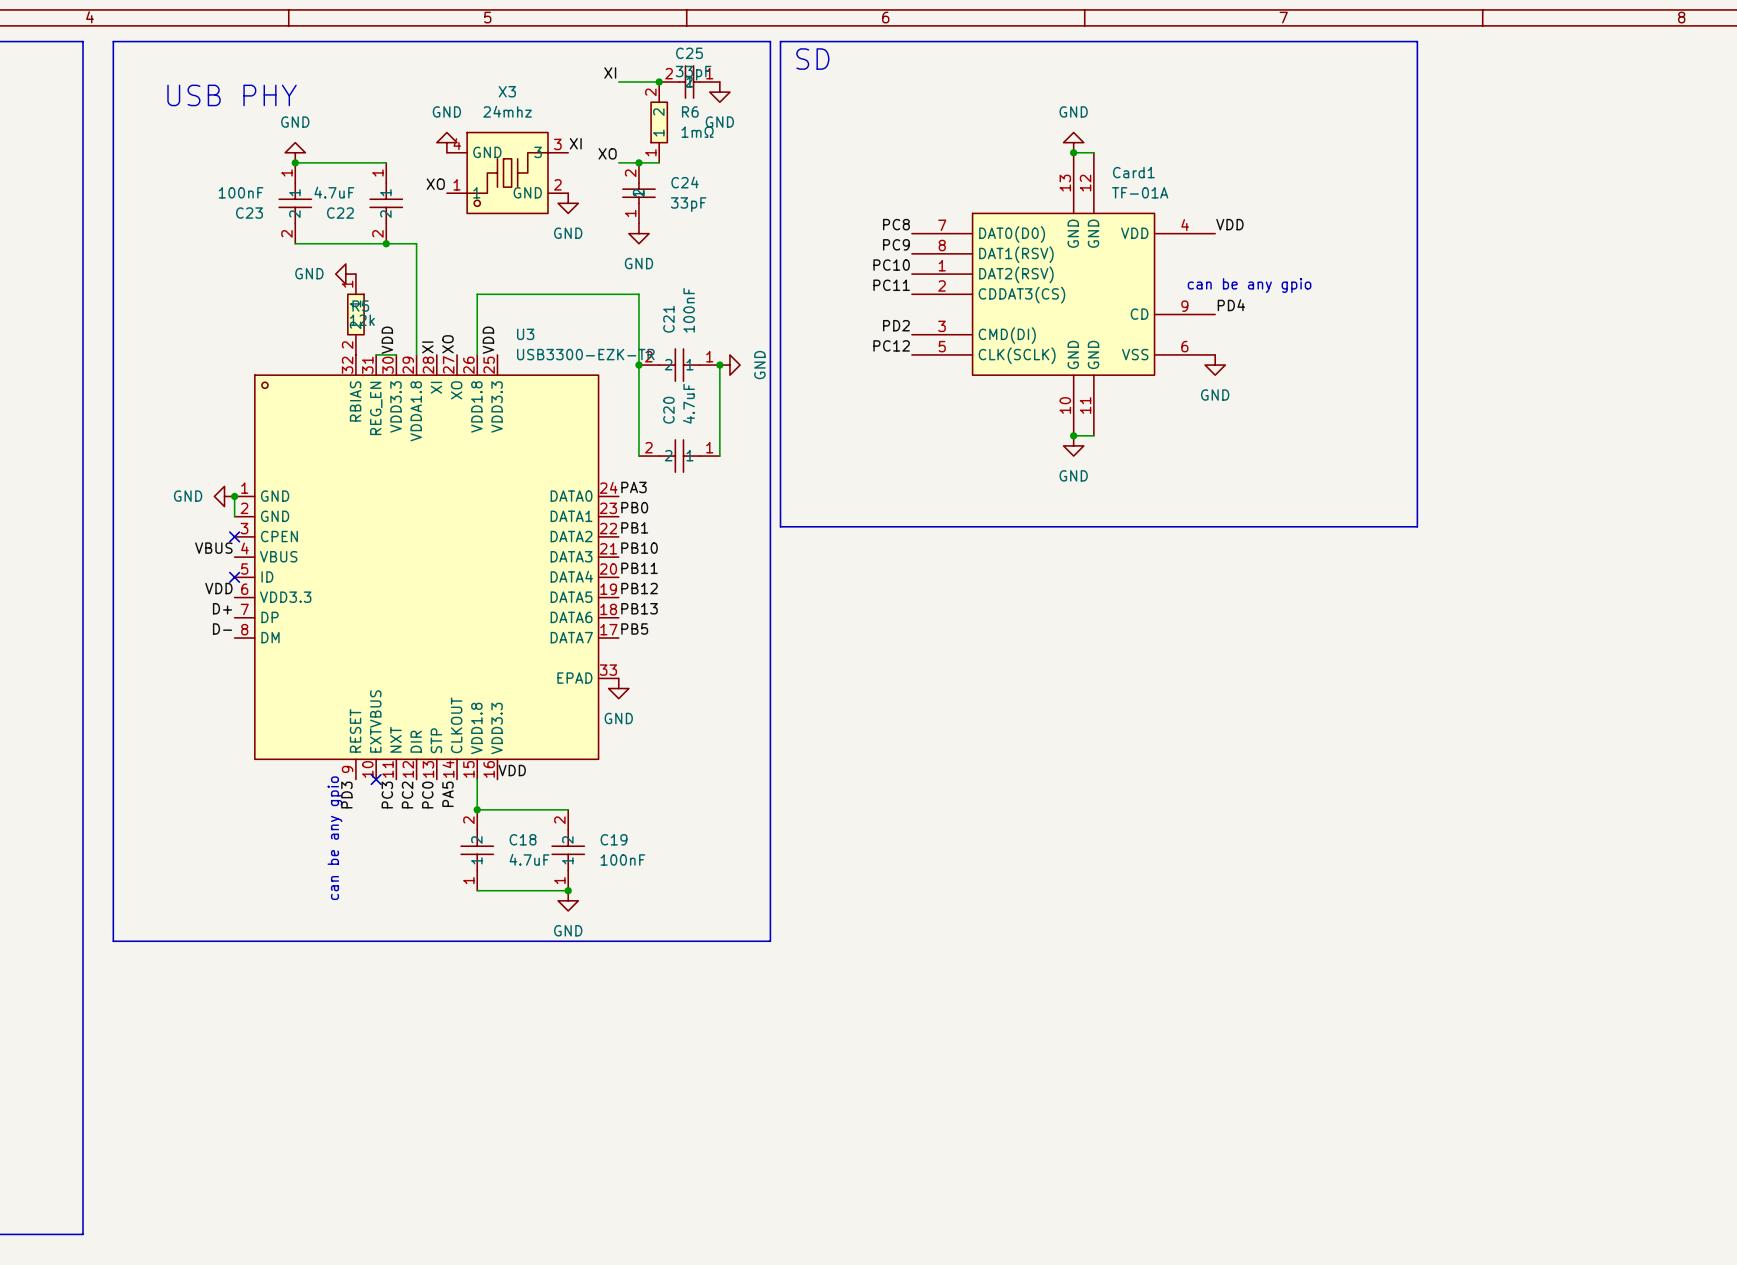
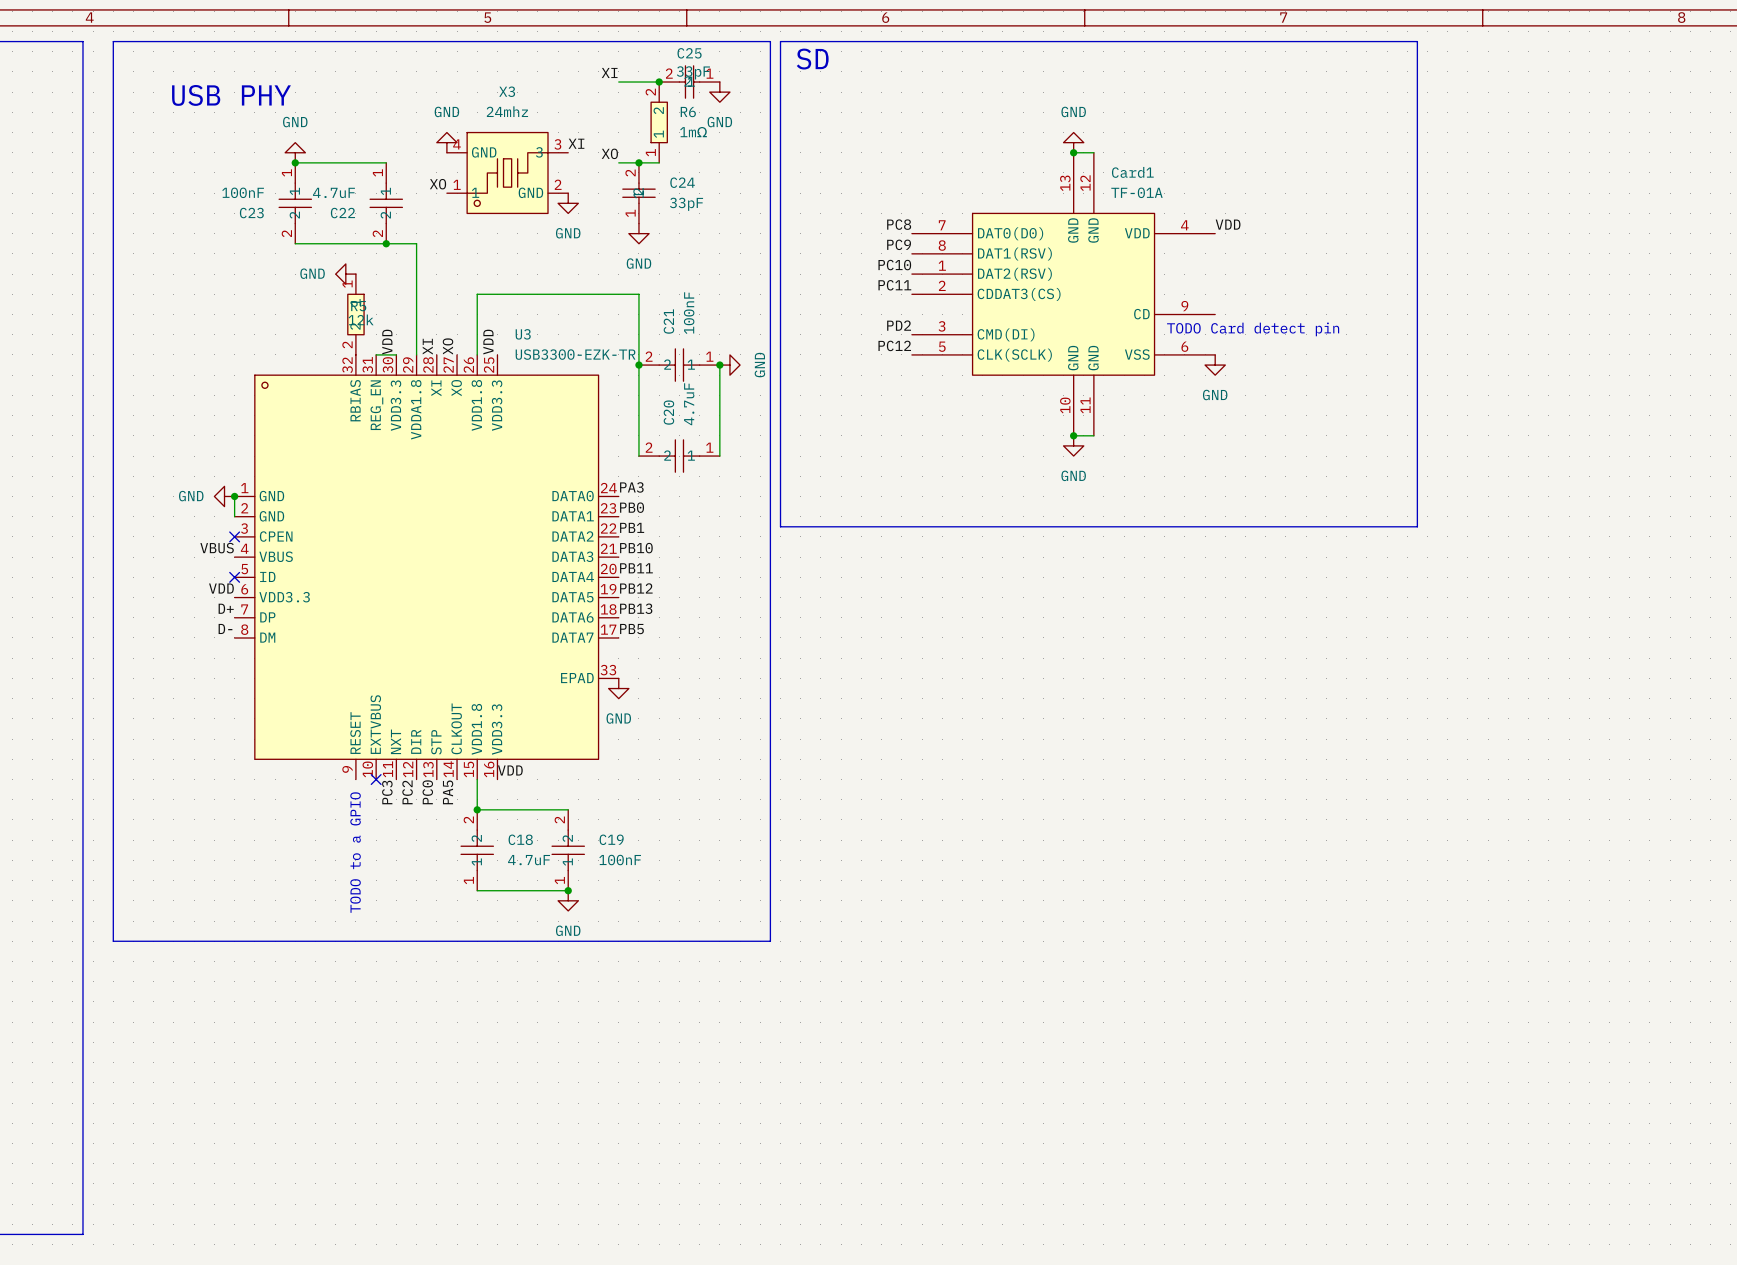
text: can be any gpio (1249, 285) -> none
label: PD4 (1231, 305) -> none
text: none -> TODO Card detect pin (1253, 329)
label: PD3 (346, 795) -> none
text: can be any gpio (335, 838) -> none
text: none -> TODO to a GPIO (355, 852)

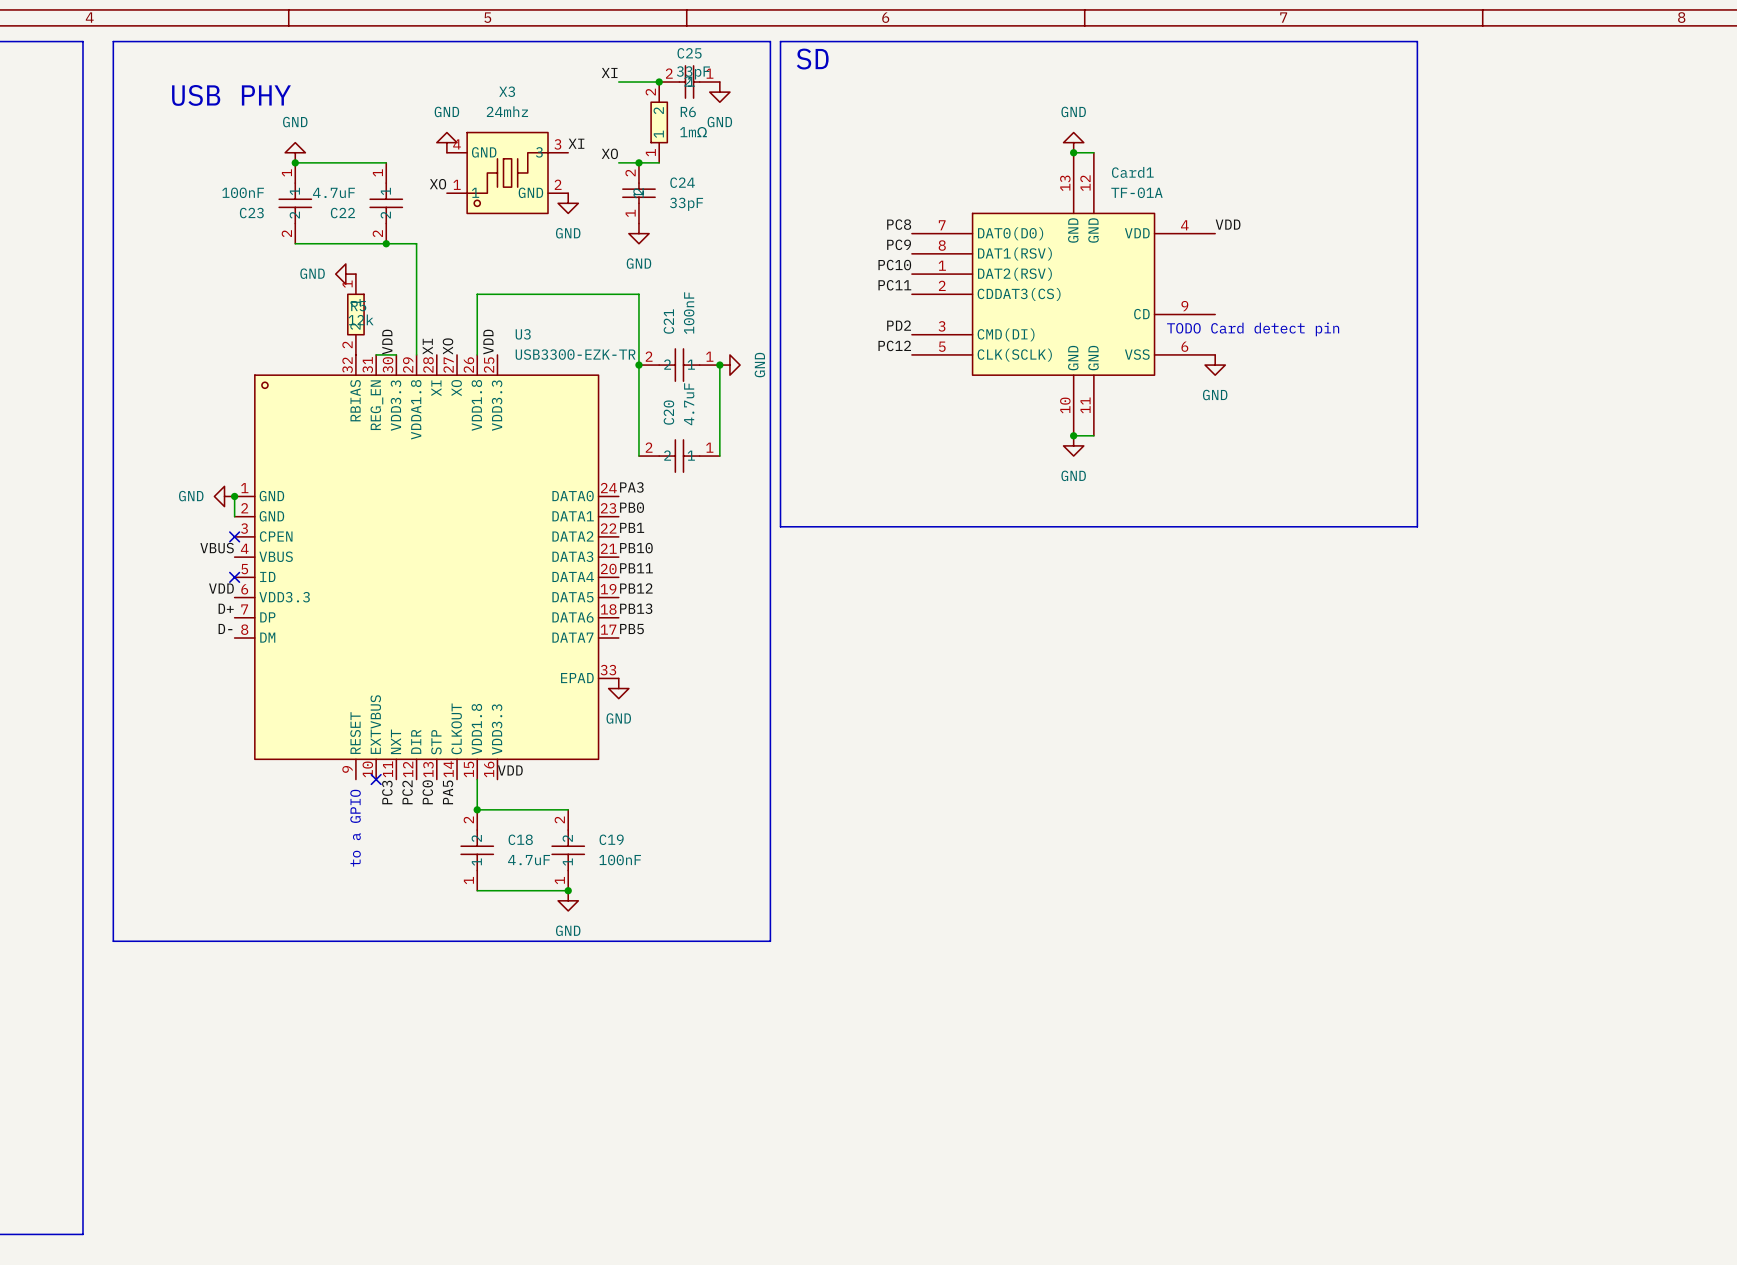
text: TODO to a GPIO (355, 852) -> to a GPIO (355, 828)

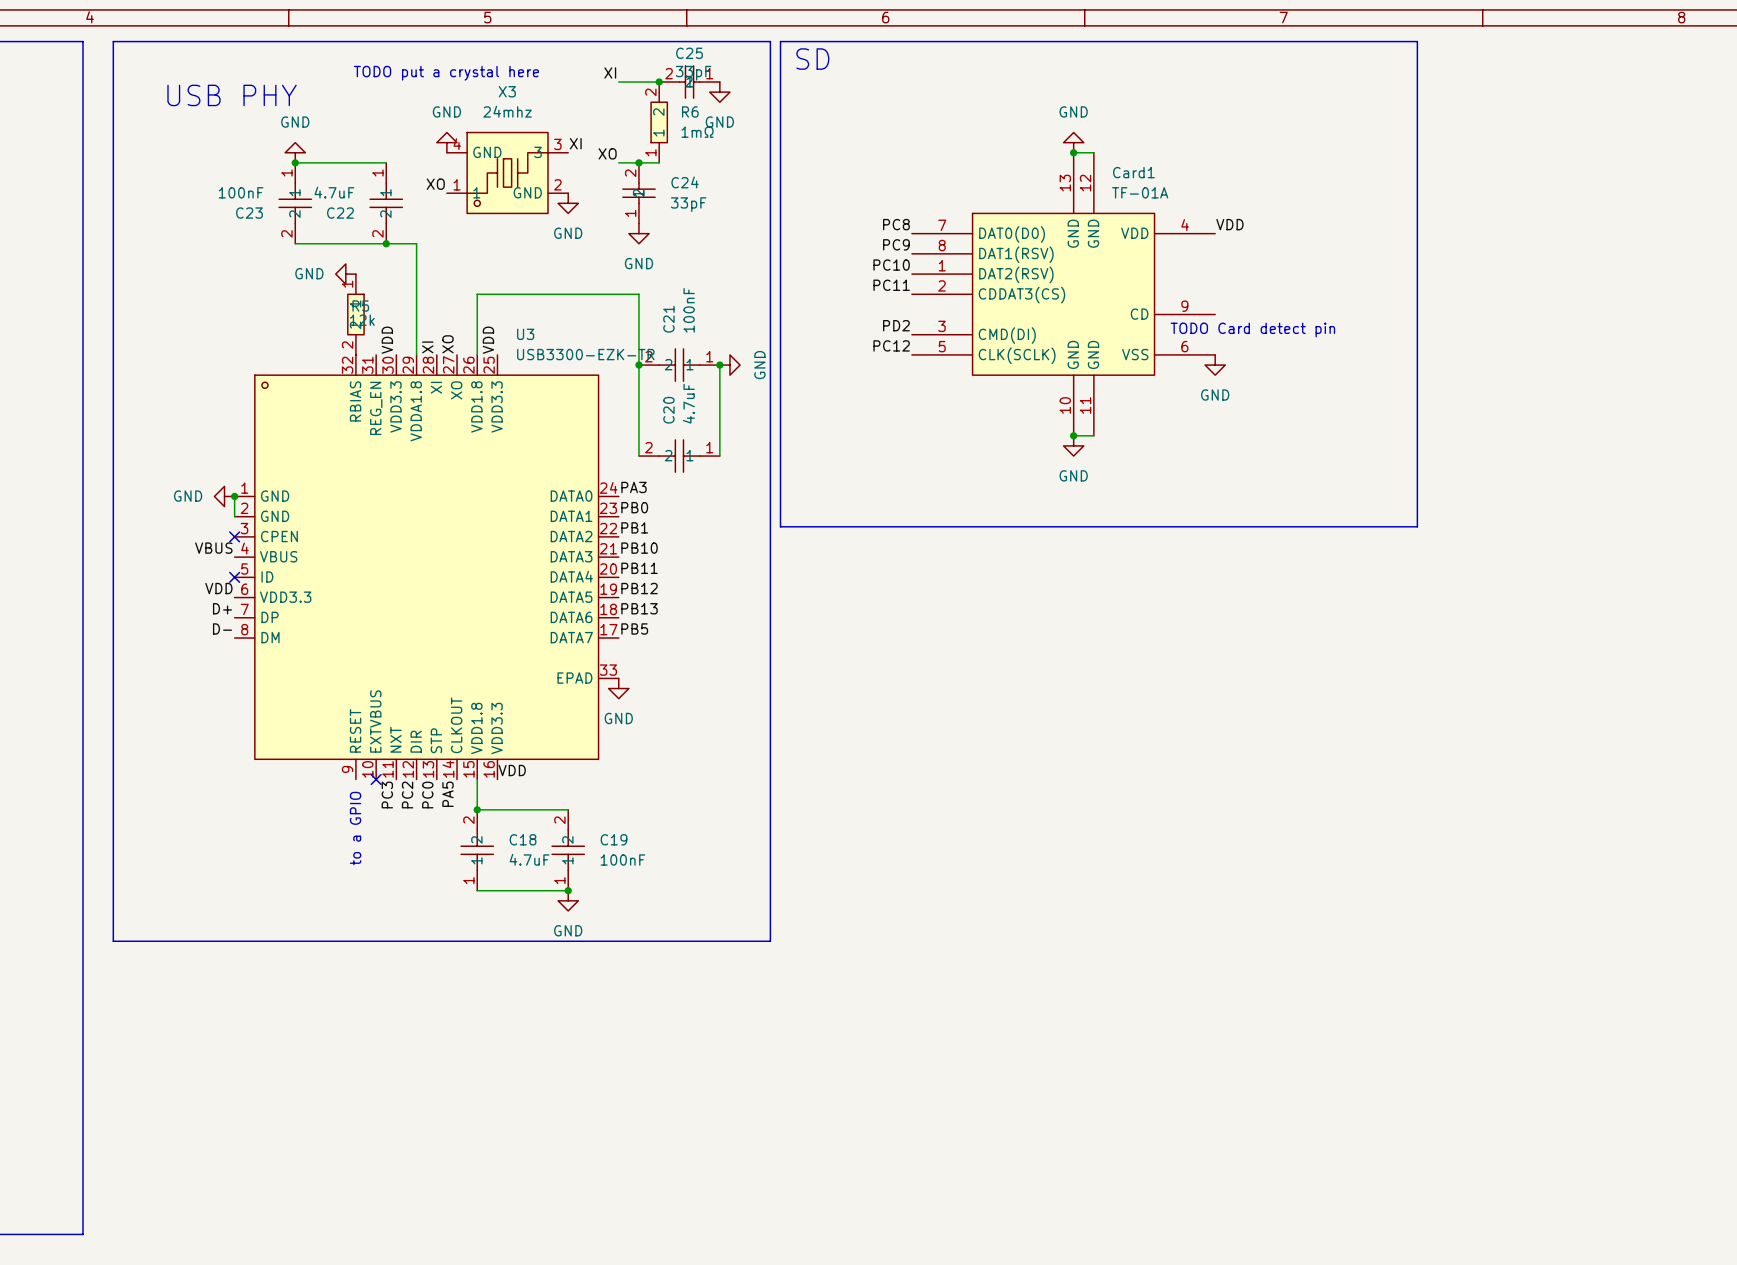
text: none -> TODO put a crystal here (446, 73)
wire: (376, 354) (396, 354) -> none

